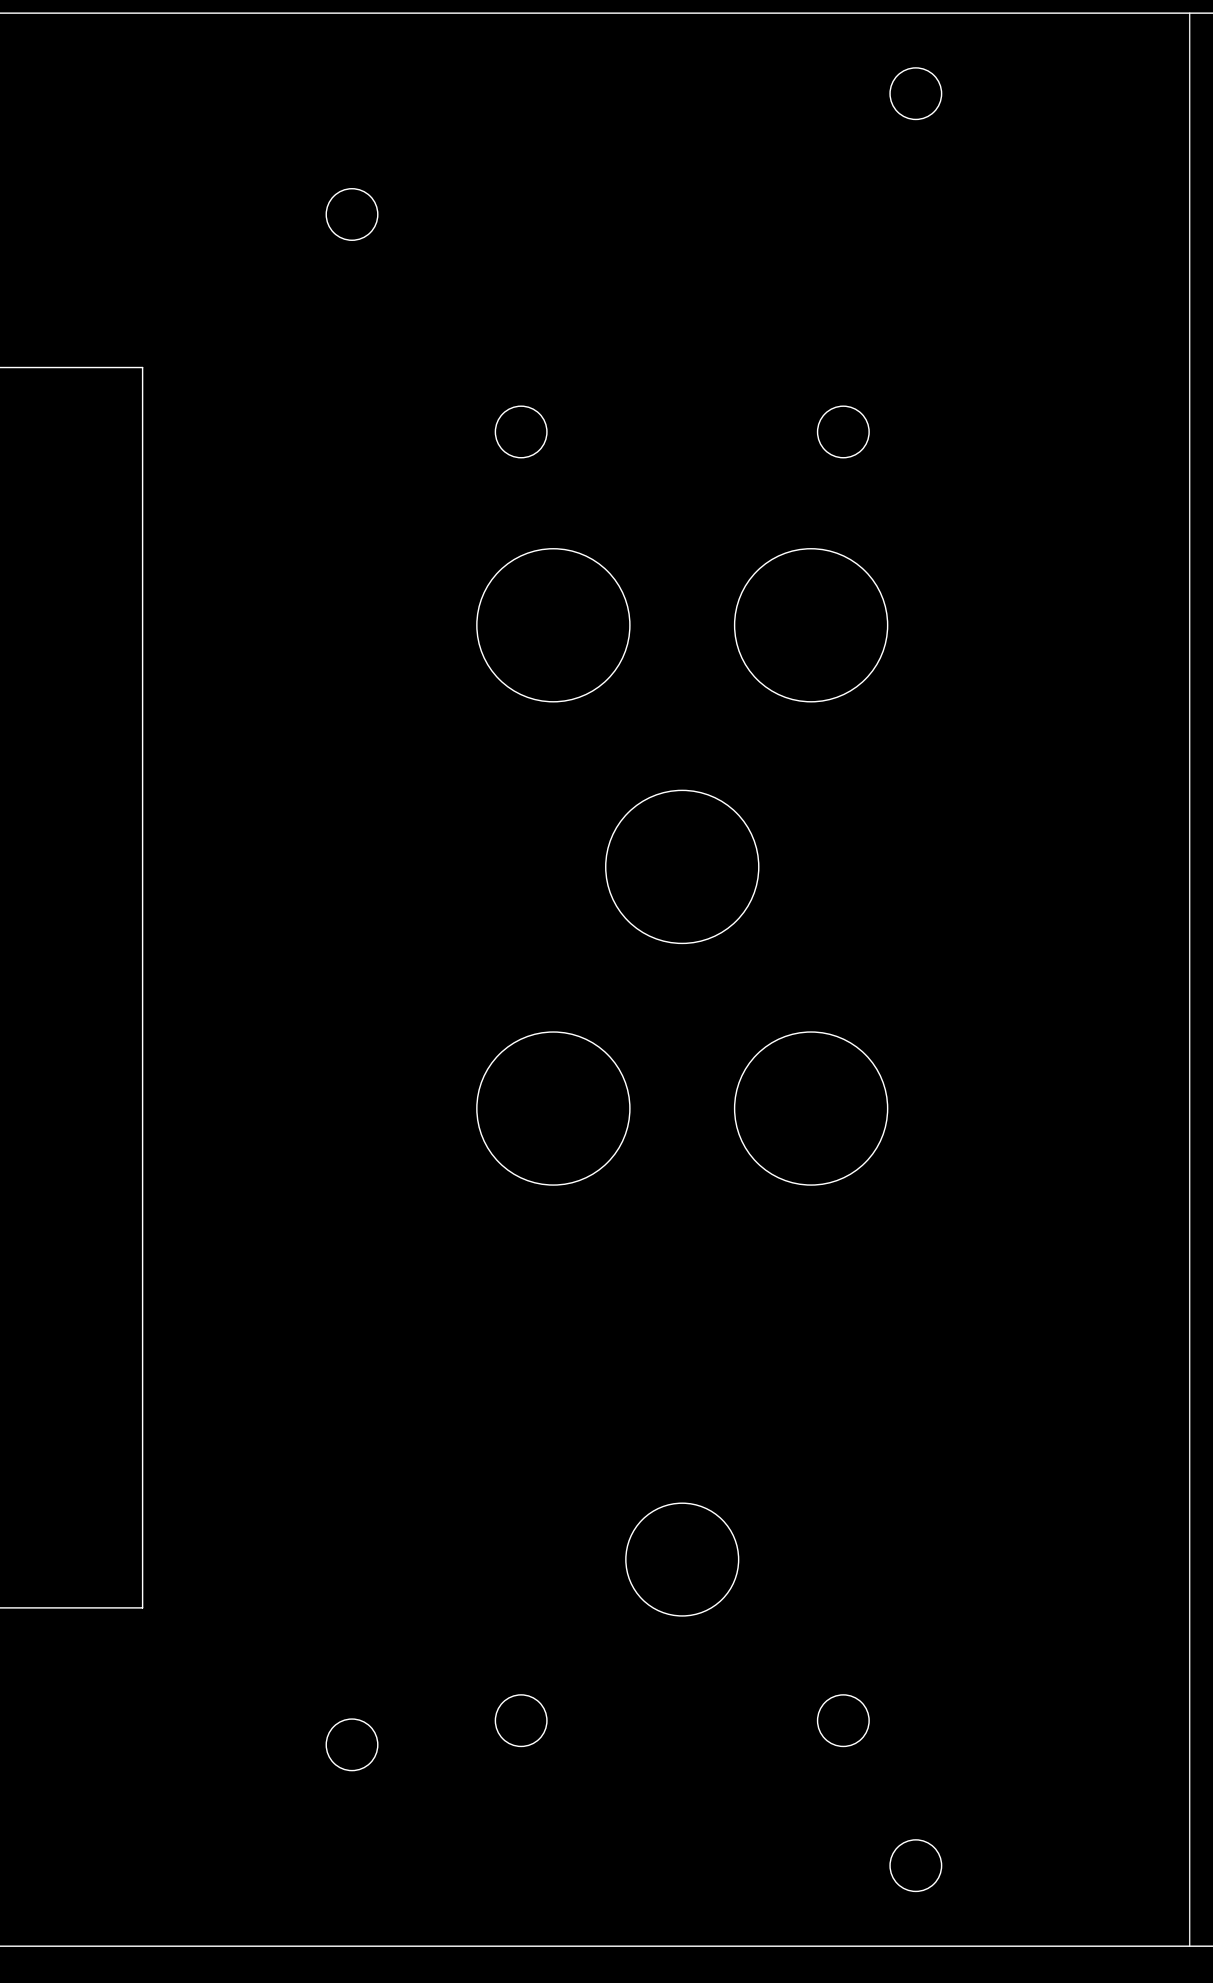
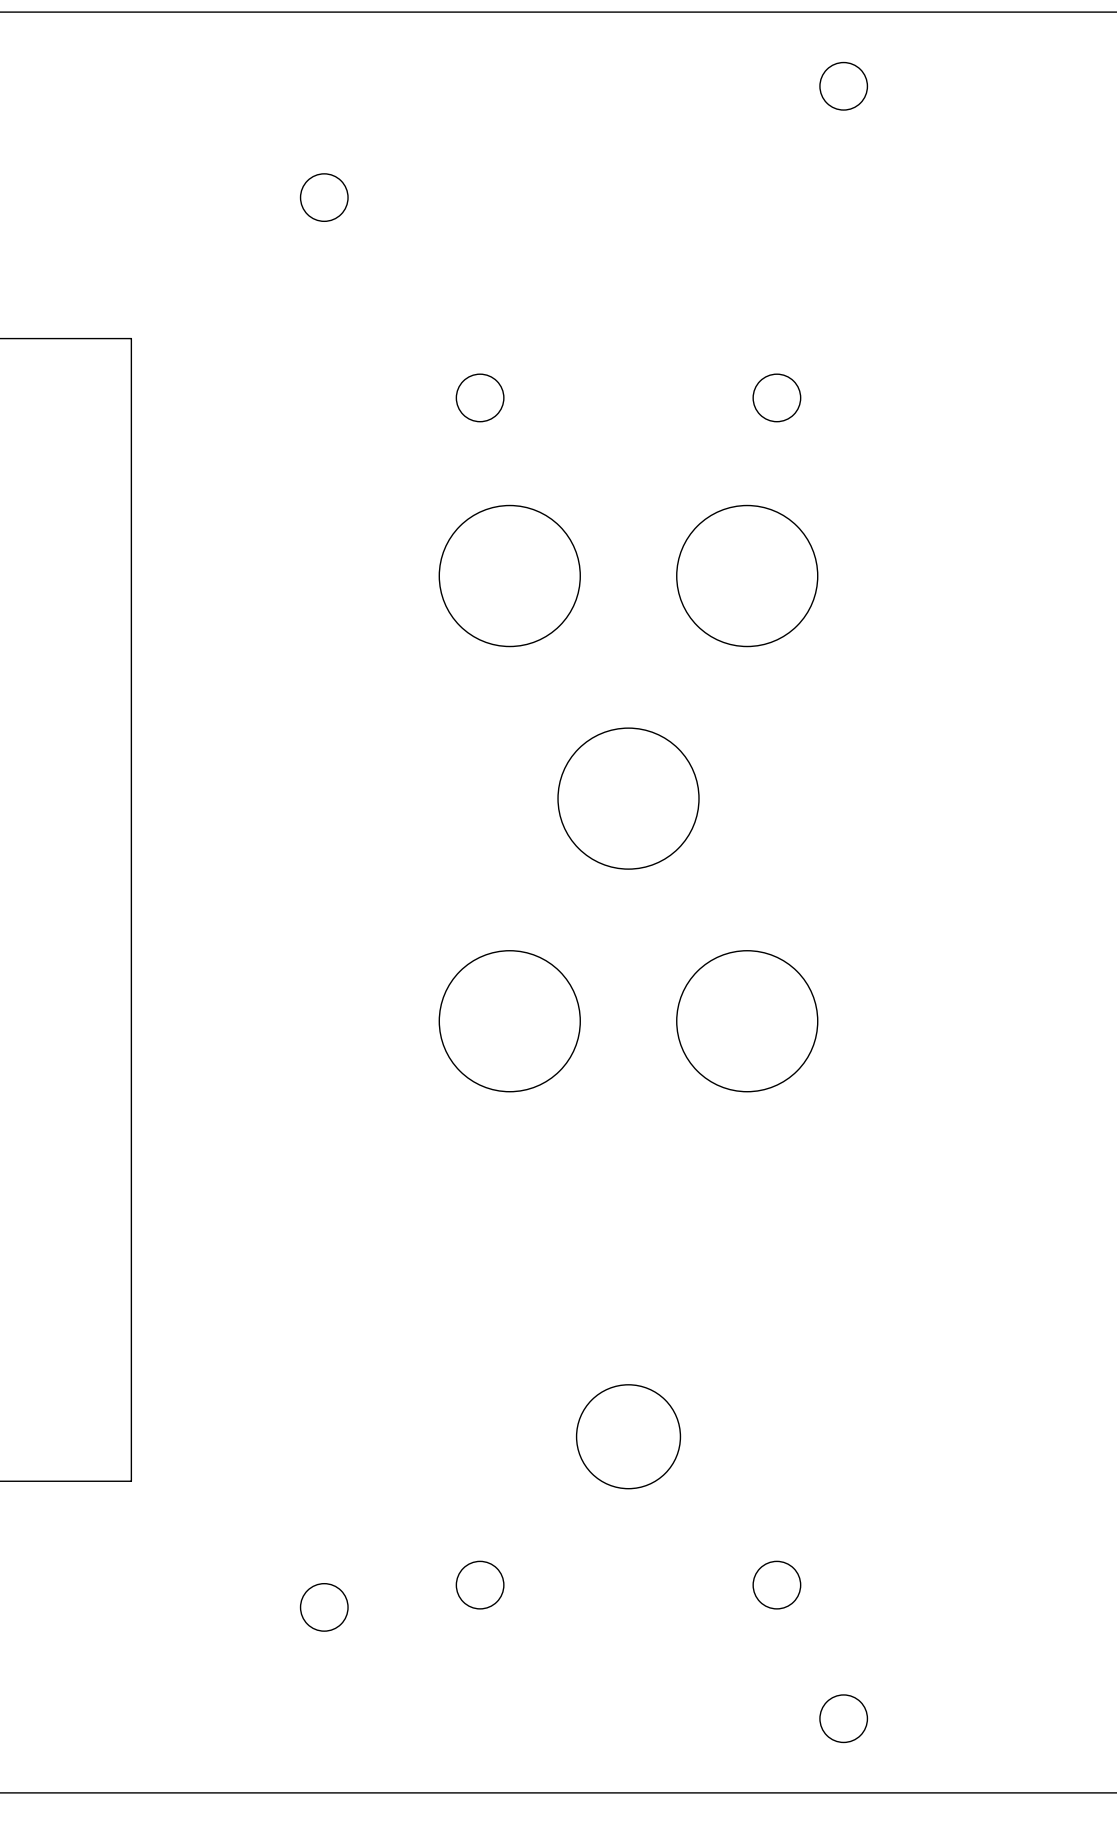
line: (1189, 13) (1189, 1946) -> none

